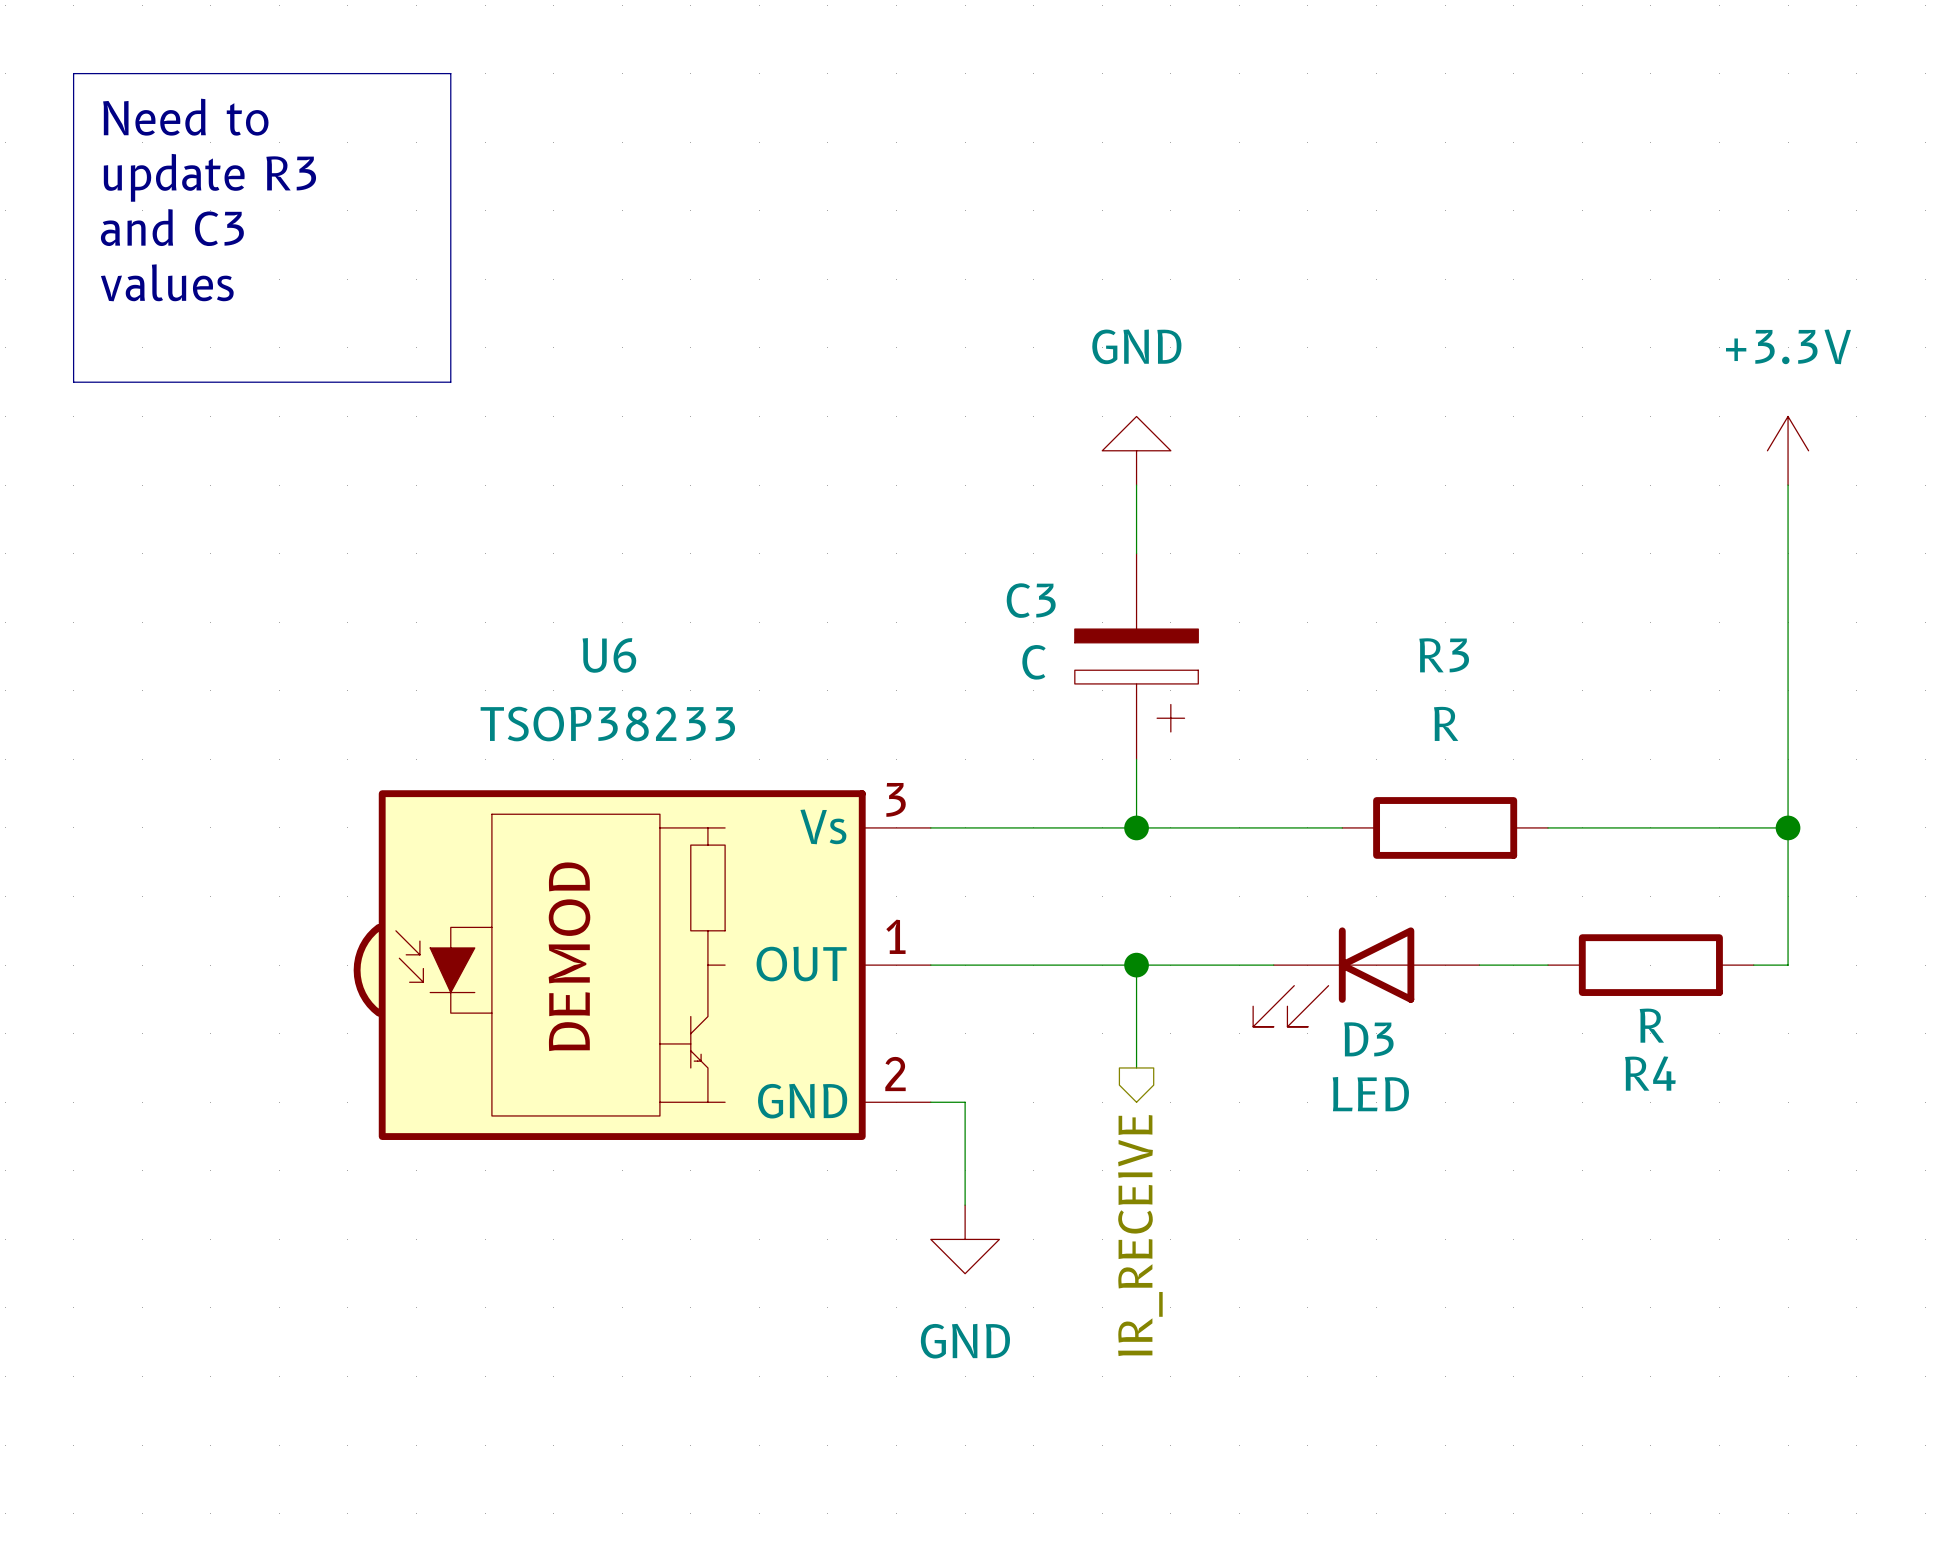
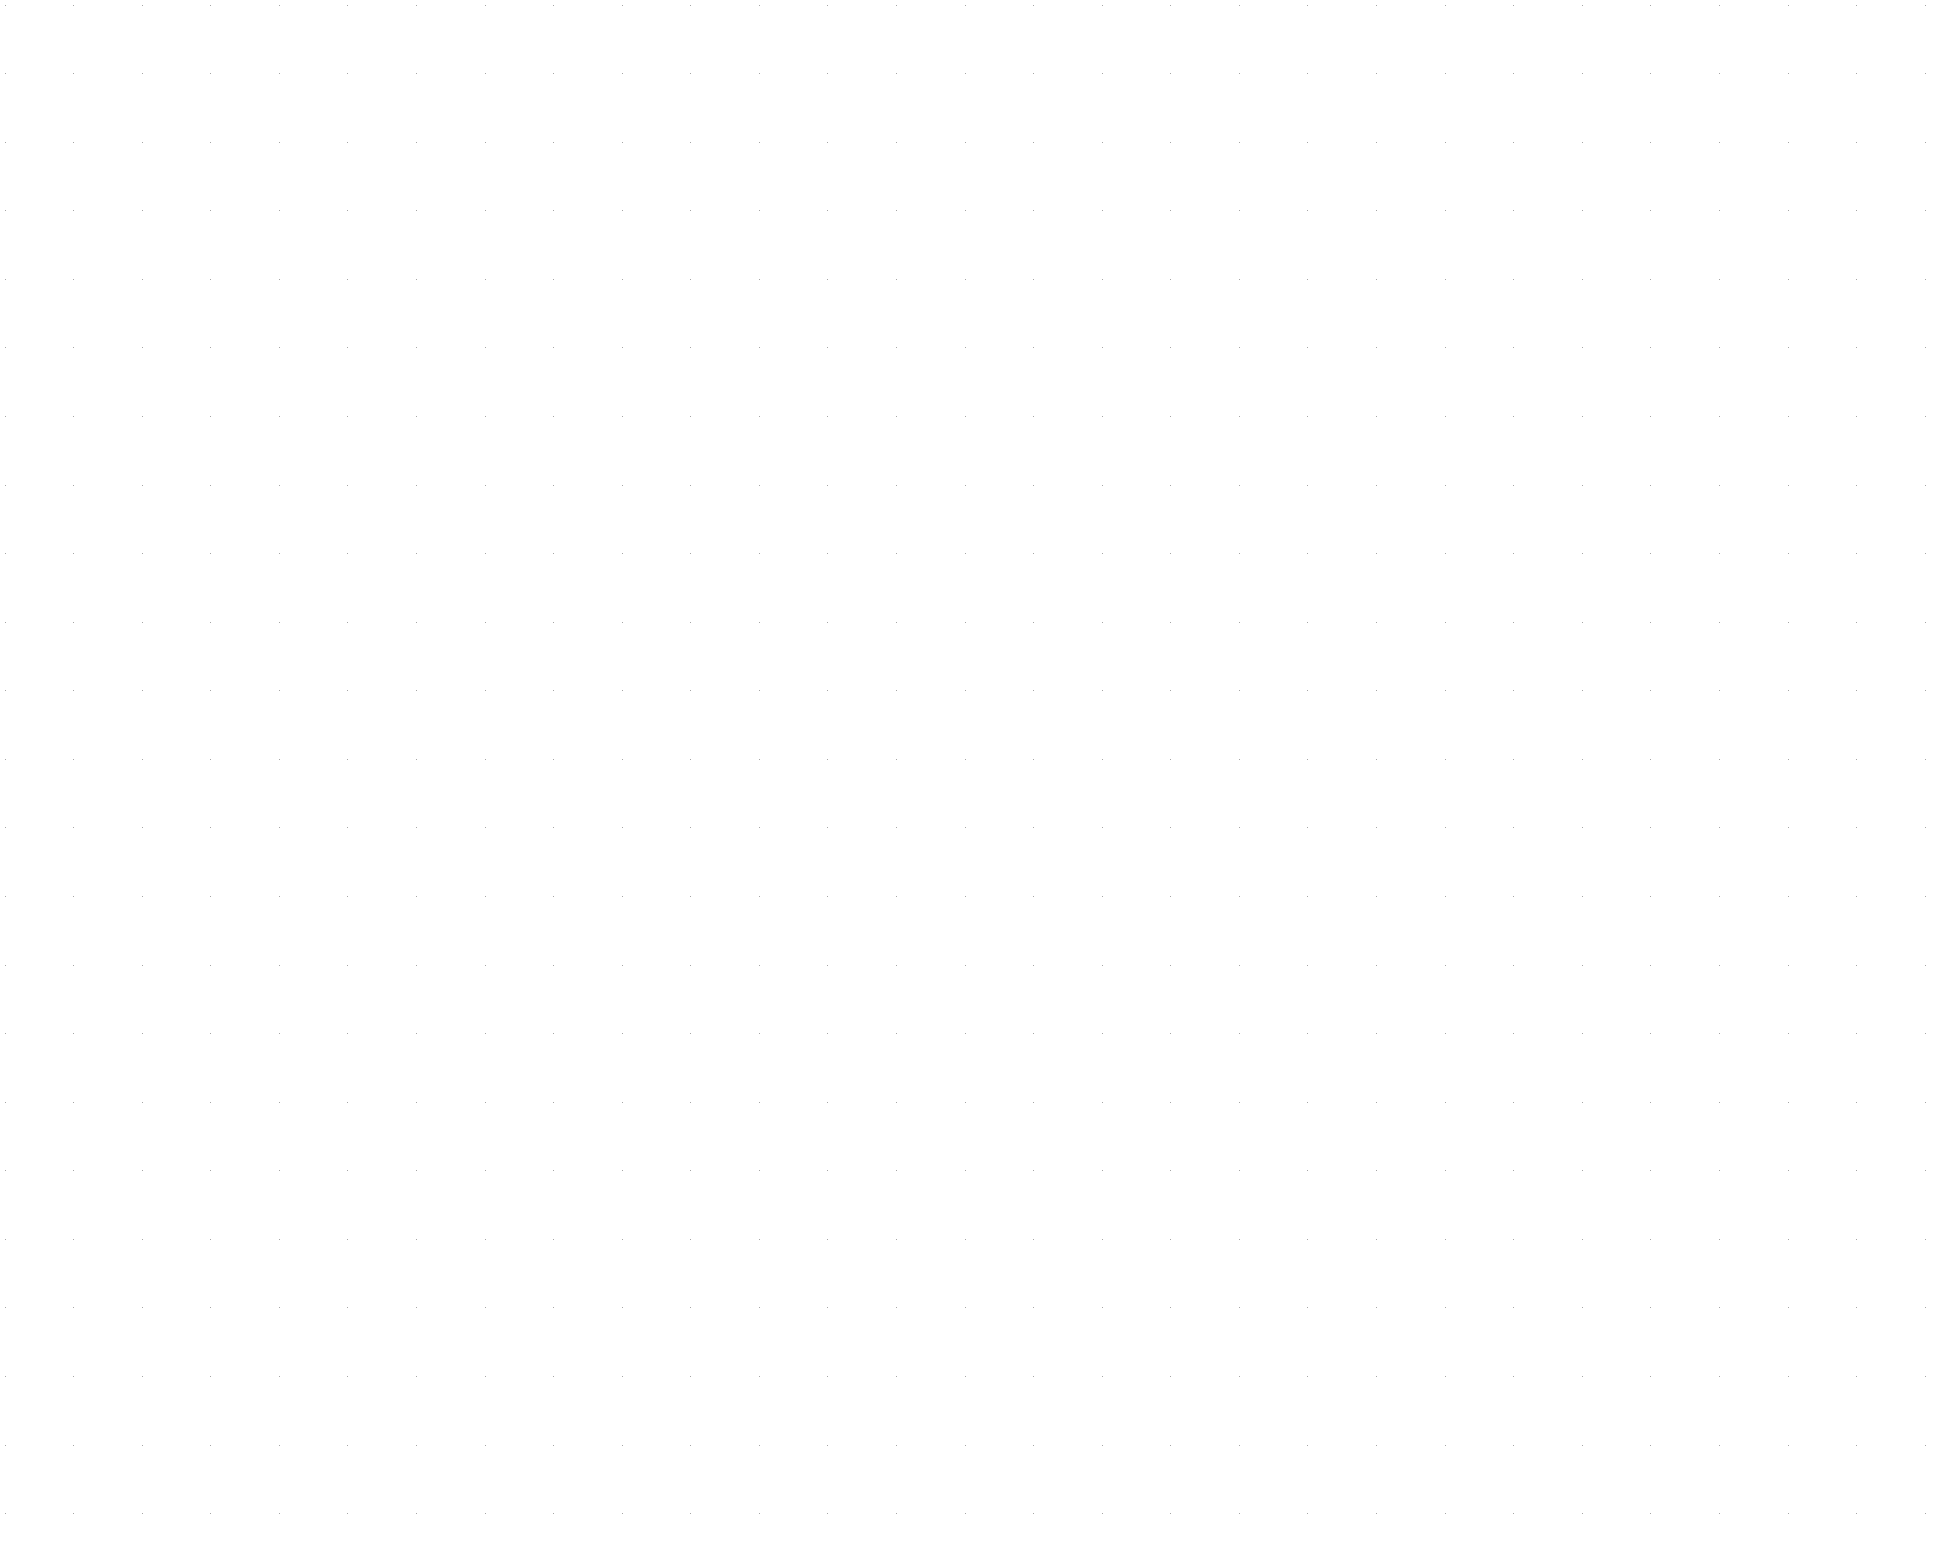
line: (73, 73) (450, 73) (450, 382) (73, 382) (73, 73) -> none
text: Need to (185, 117) -> none
text: update R3 (209, 177) -> none
text: and C3 (172, 227) -> none
text: values (167, 282) -> none
power symbol: GND (1136, 450) -> none
power symbol: +3.3V (1788, 450) -> none
wire: (1136, 485) (1136, 553) -> none
wire: (1788, 485) (1788, 965) (1753, 965) -> none
C3: C (1136, 656) -> none
wire: (1136, 759) (1136, 827) -> none
wire: (930, 827) (1342, 827) -> none
junction: (1136, 827) -> none
R3: R (1445, 827) -> none
wire: (1548, 827) (1788, 827) -> none
junction: (1788, 827) -> none
U6: TSOP38233 (642, 965) -> none
wire: (930, 965) (1273, 965) -> none
wire: (1136, 965) (1136, 1067) -> none
junction: (1136, 965) -> none
wire: (1479, 965) (1548, 965) -> none
R4: R (1650, 965) -> none
D3: LED (1366, 977) -> none
wire: (930, 1102) (965, 1102) (965, 1205) -> none
hierarchical label: IR_RECEIVE (1140, 1235) -> none
power symbol: GND (965, 1239) -> none

